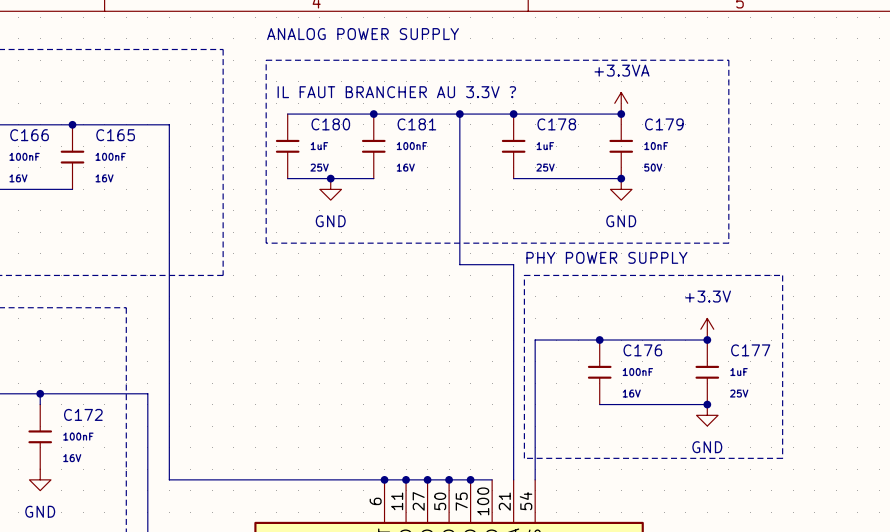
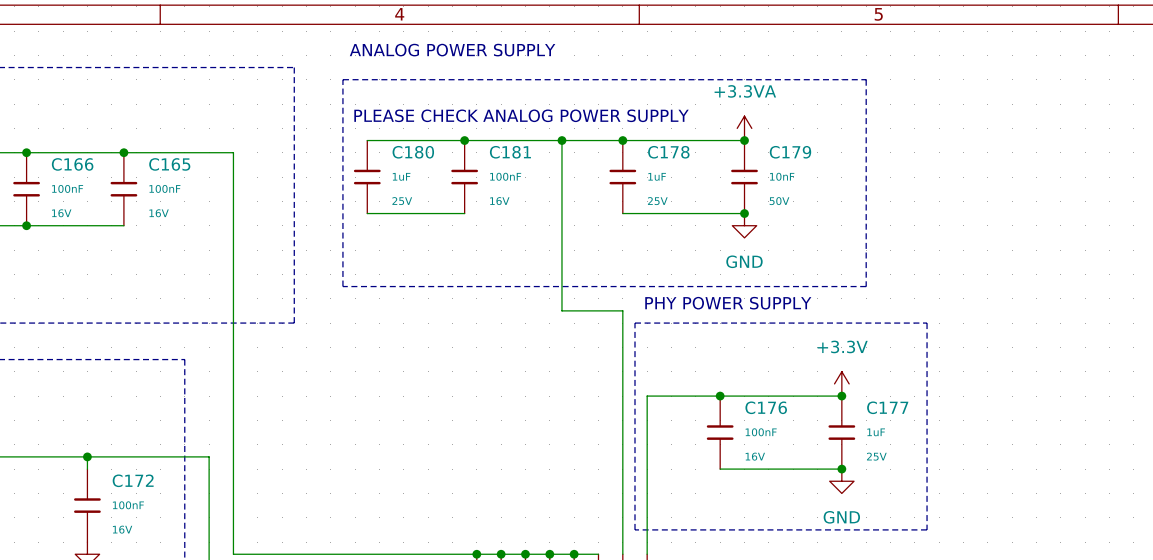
text: IL FAUT BRANCHER AU 3.3V ? (396, 92) -> PLEASE CHECK ANALOG POWER SUPPLY (521, 115)
junction: (330, 178) -> none
power symbol: GND (330, 189) -> none

